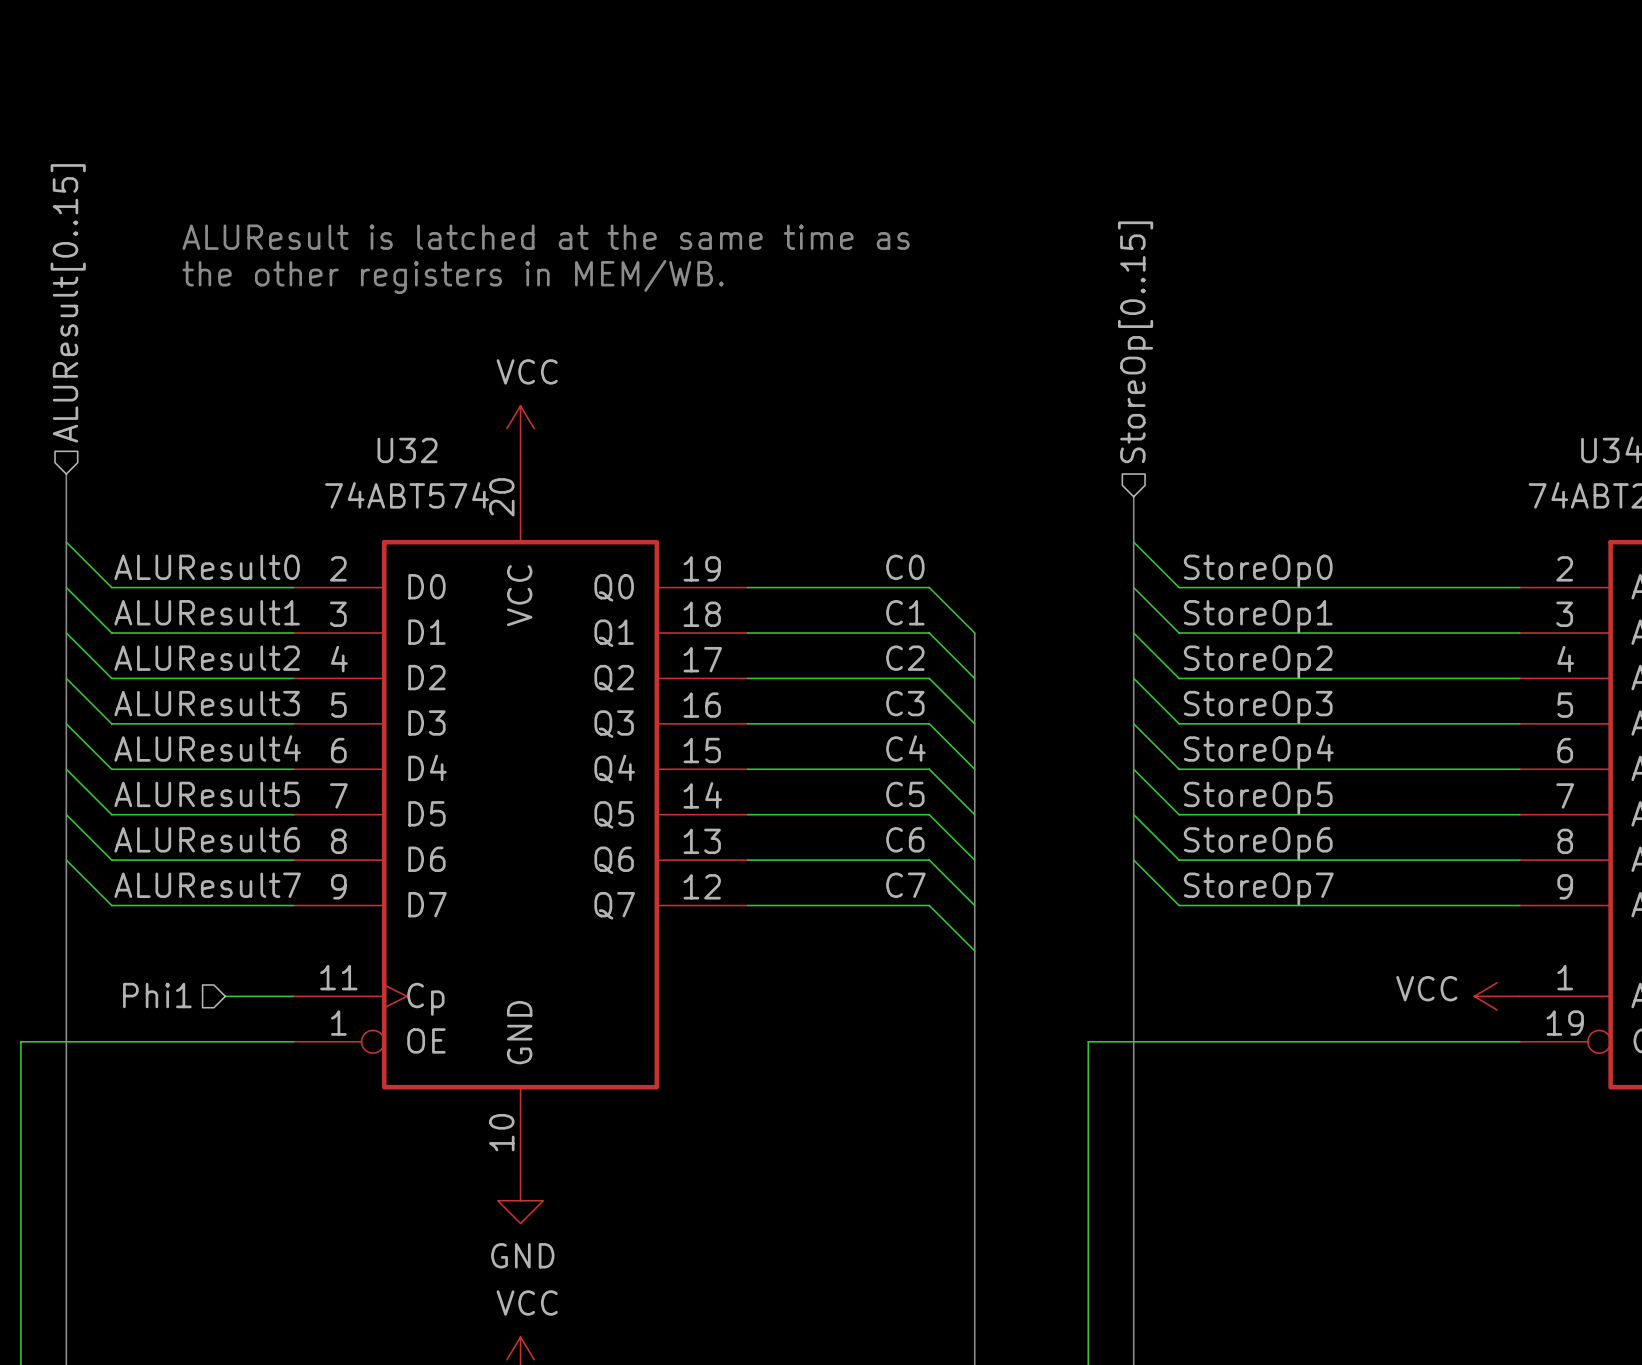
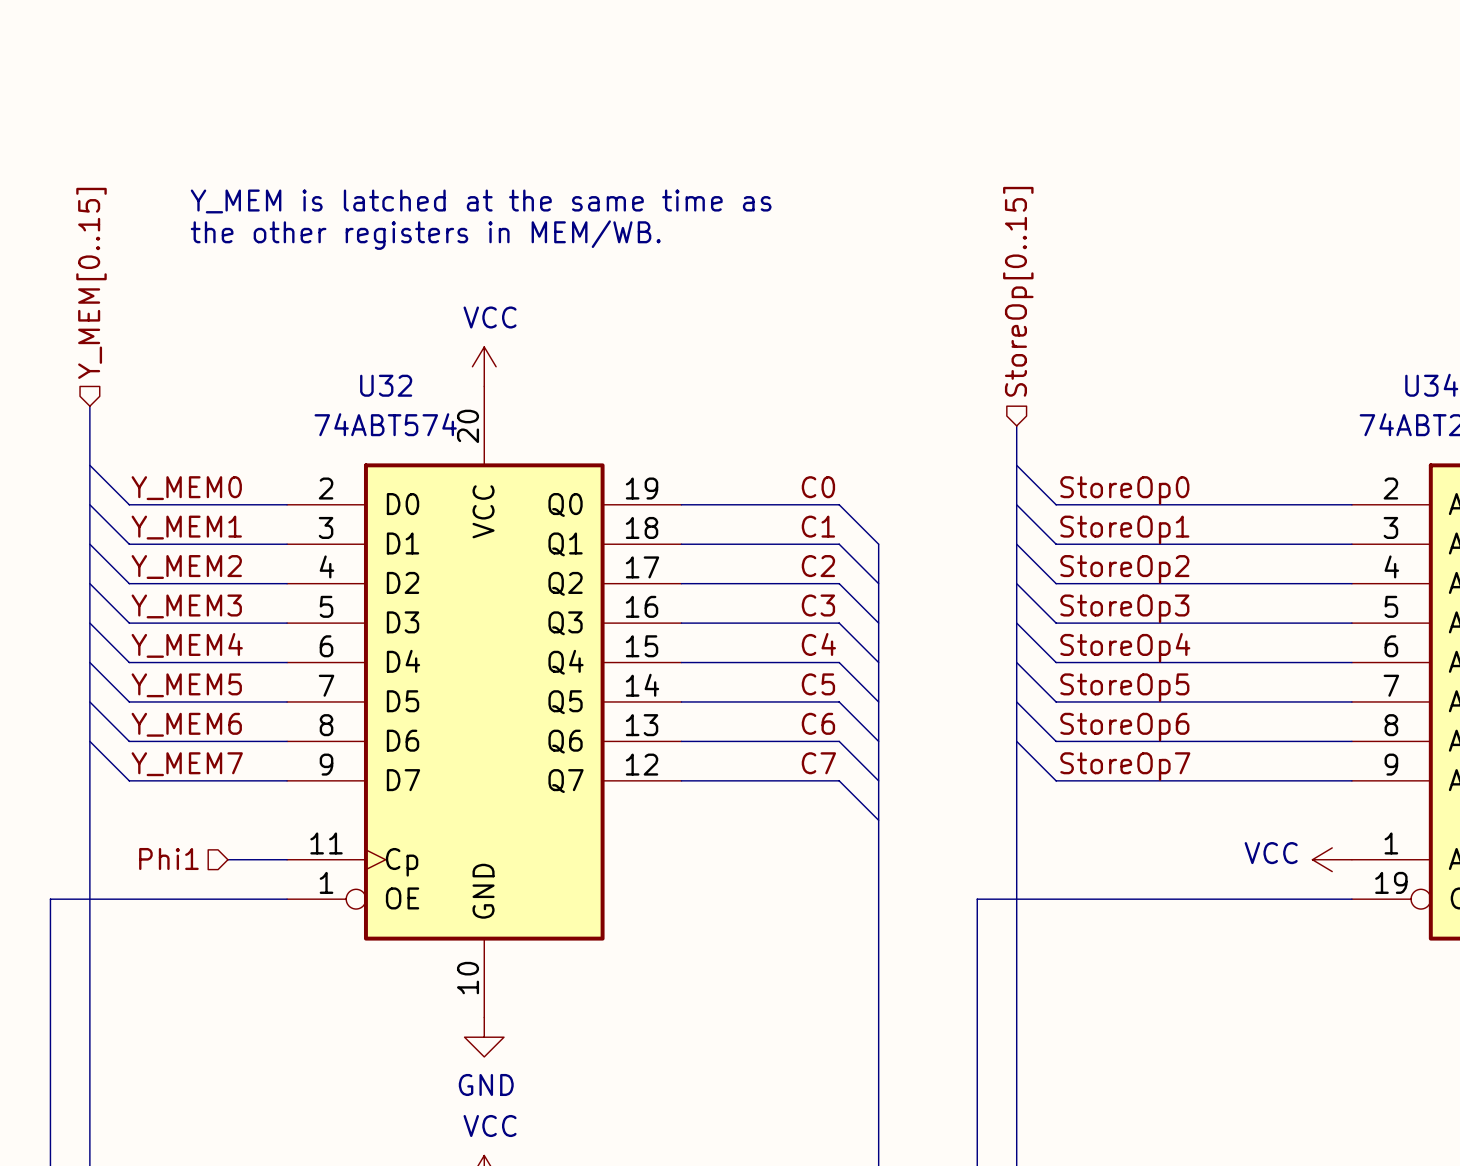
text: ALUResult is latched at the same time as (546, 237) -> Y_MEM is latched at the same time as (481, 201)
hierarchical label: ALUResult[0..15] (68, 303) -> Y_MEM[0..15] (91, 283)
label: ALUResult0 (207, 567) -> Y_MEM0 (186, 488)
label: ALUResult1 (207, 612) -> Y_MEM1 (186, 527)
label: ALUResult2 (207, 658) -> Y_MEM2 (186, 567)
label: ALUResult3 (207, 703) -> Y_MEM3 (186, 606)
label: ALUResult4 (207, 748) -> Y_MEM4 (187, 645)
label: ALUResult5 (207, 794) -> Y_MEM5 (186, 685)
label: ALUResult6 (207, 839) -> Y_MEM6 (186, 724)
label: ALUResult7 (207, 885) -> Y_MEM7 (187, 764)

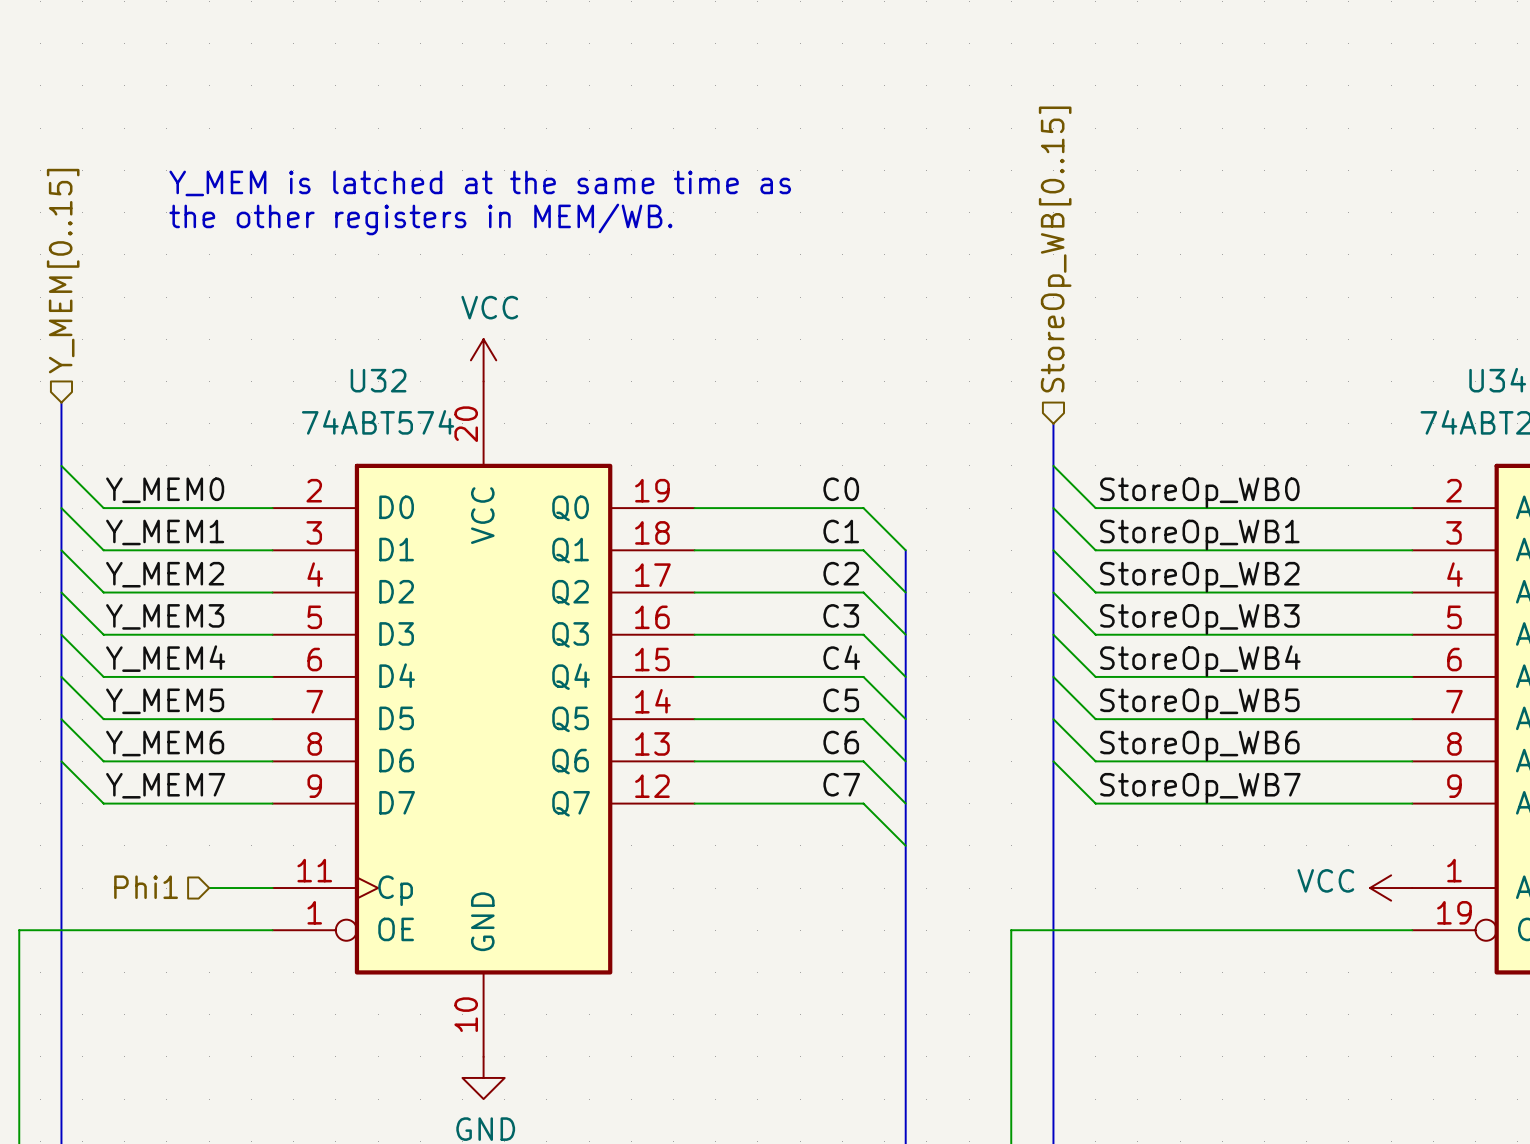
hierarchical label: StoreOp[0..15] (1018, 291) -> StoreOp_WB[0..15] (1055, 249)
label: StoreOp0 (1124, 490) -> StoreOp_WB0 (1199, 492)
label: StoreOp1 (1124, 529) -> StoreOp_WB1 (1199, 534)
label: StoreOp2 (1124, 569) -> StoreOp_WB2 (1199, 577)
label: StoreOp3 (1124, 608) -> StoreOp_WB3 (1199, 619)
label: StoreOp4 (1125, 647) -> StoreOp_WB4 (1200, 661)
label: StoreOp5 (1124, 687) -> StoreOp_WB5 (1199, 703)
label: StoreOp6 (1124, 727) -> StoreOp_WB6 (1199, 746)
label: StoreOp7 (1125, 766) -> StoreOp_WB7 (1200, 788)

